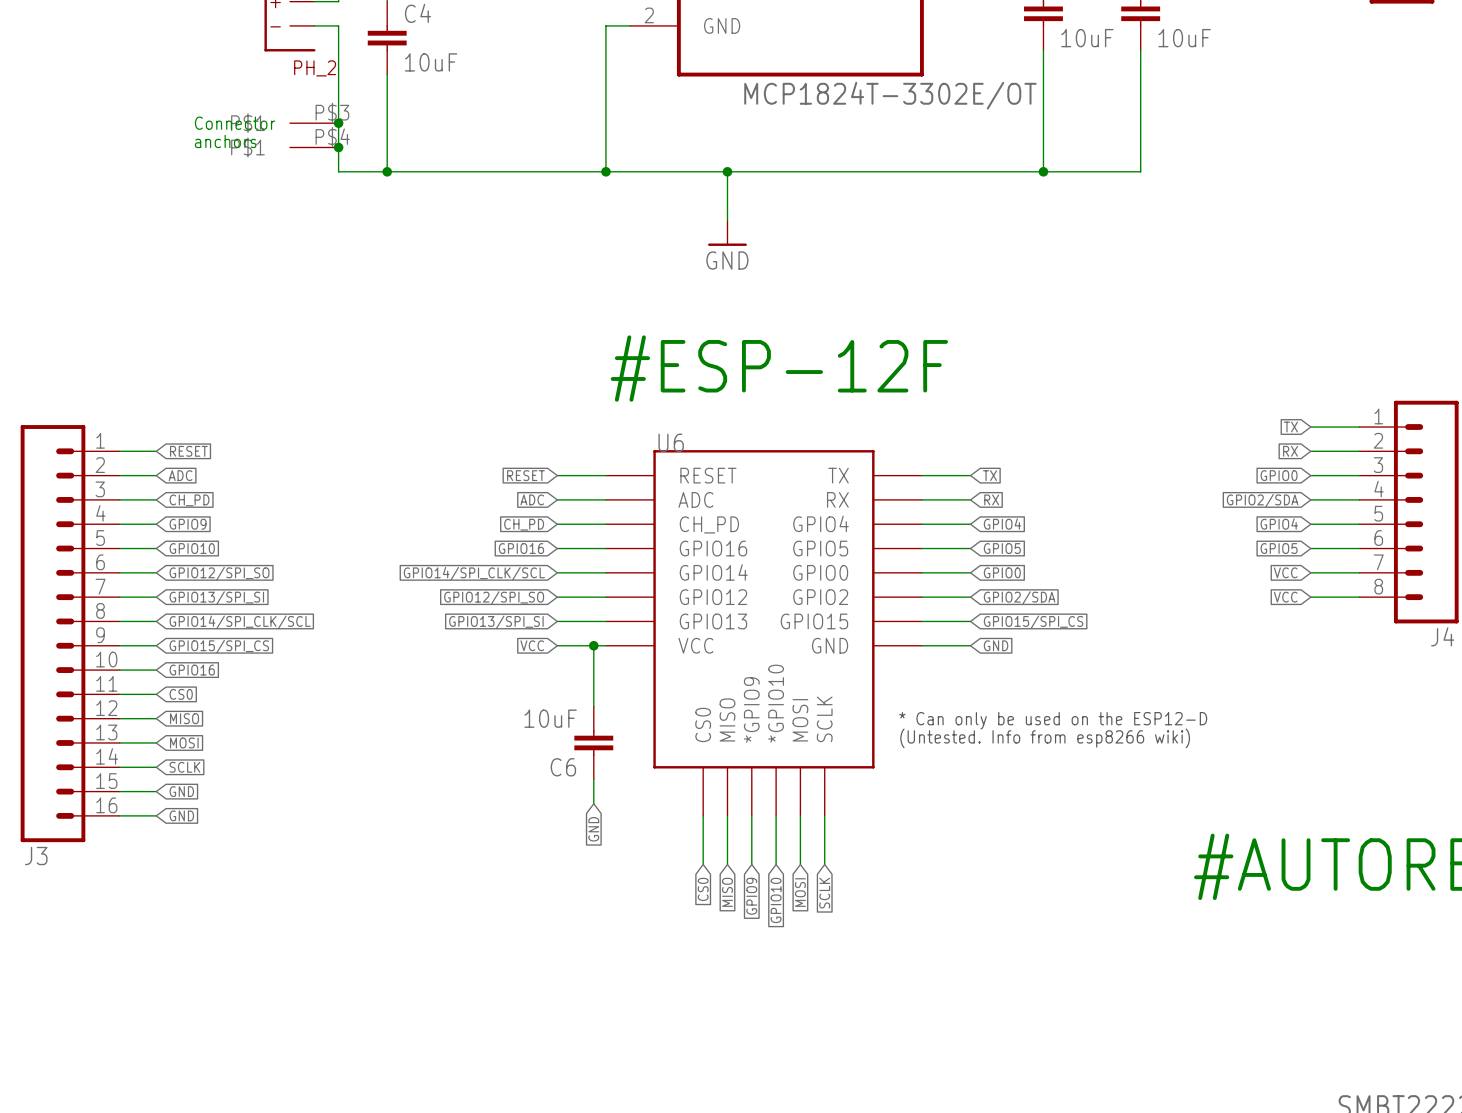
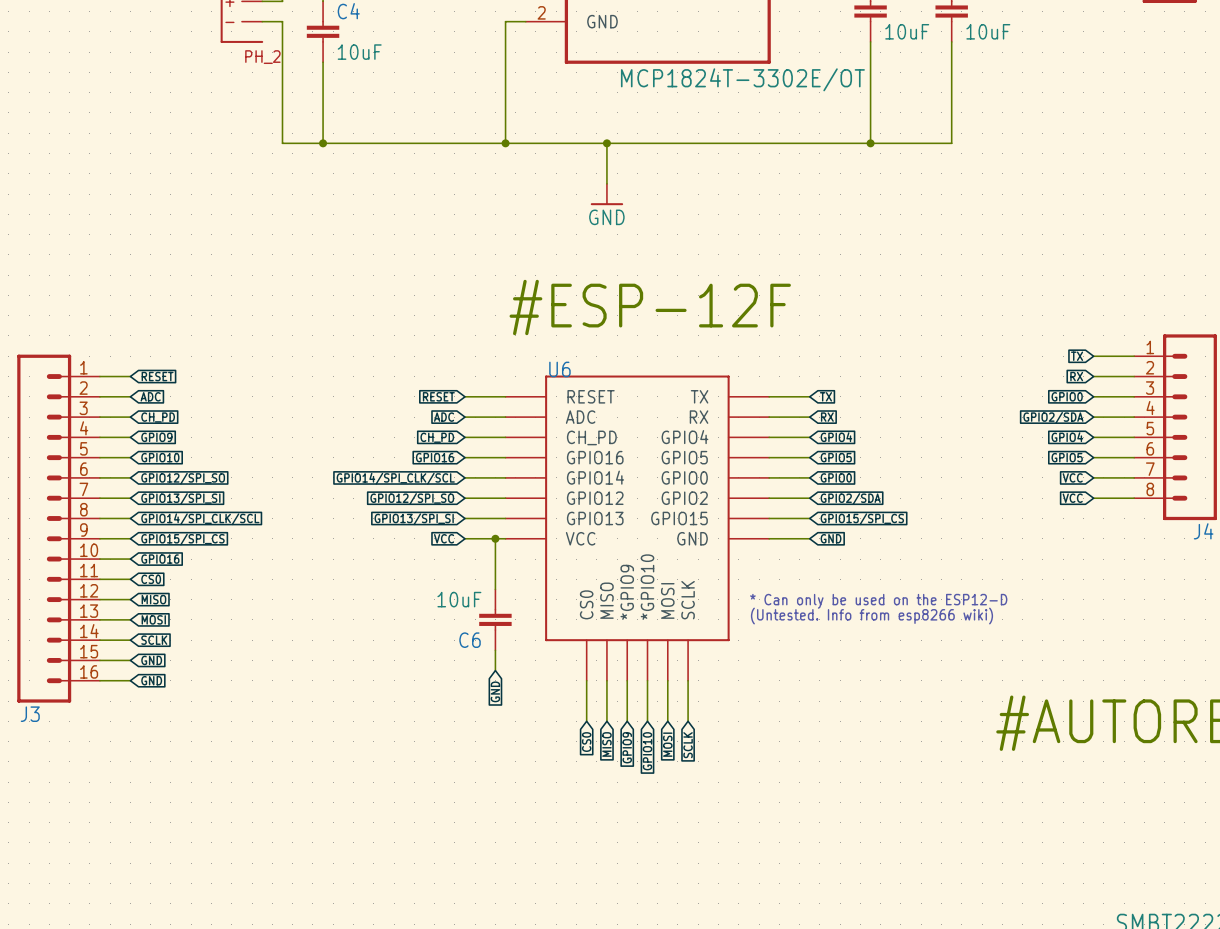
text: Connector (235, 123) -> none
part: (314, 123) -> none
junction: (338, 123) -> none
text: anchors (225, 141) -> none
part: (314, 147) -> none
junction: (338, 147) -> none

